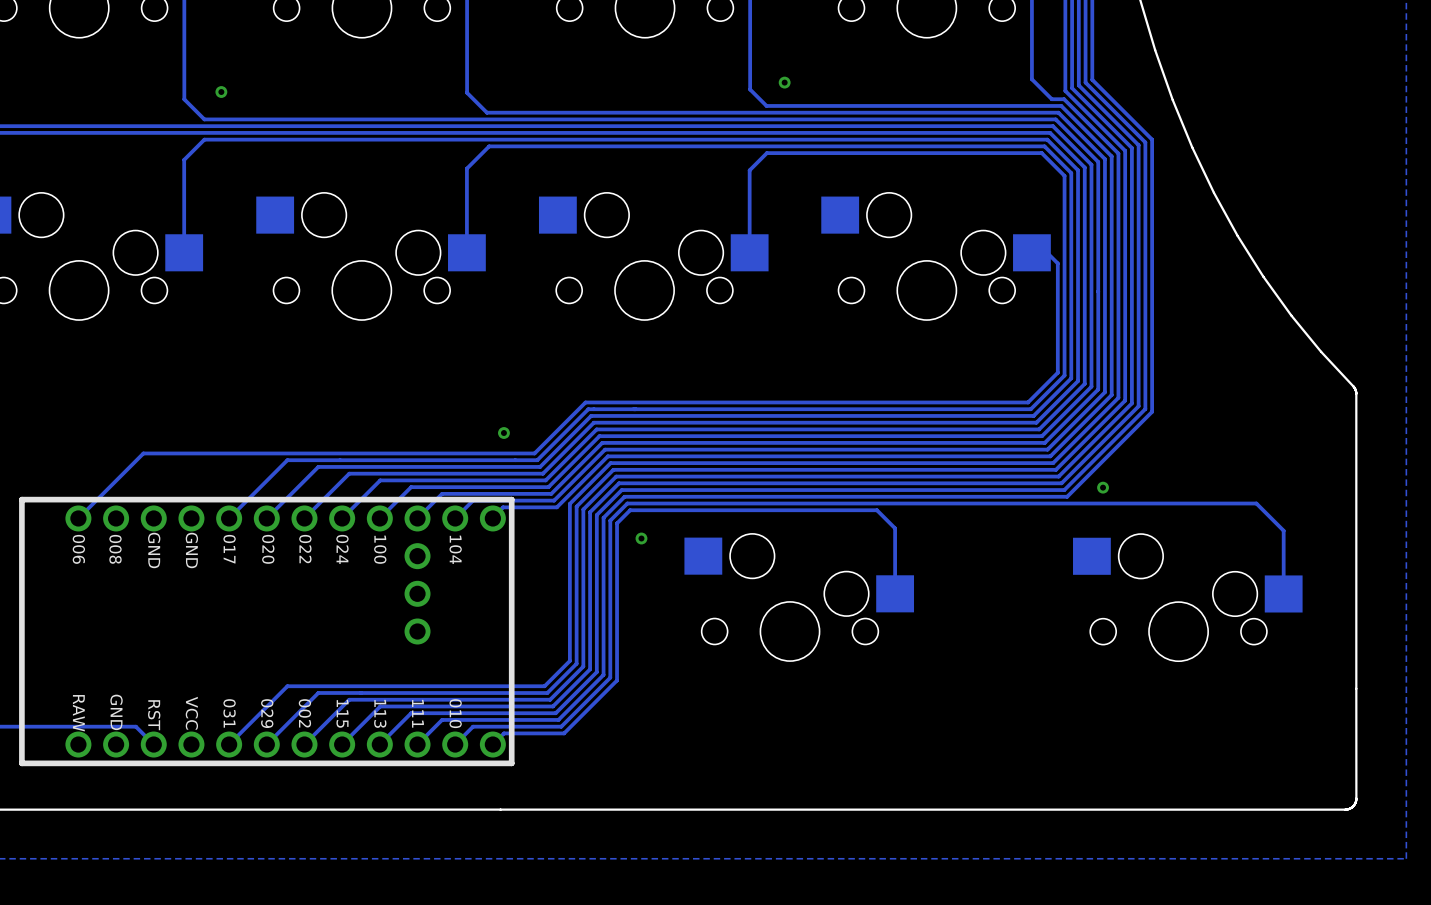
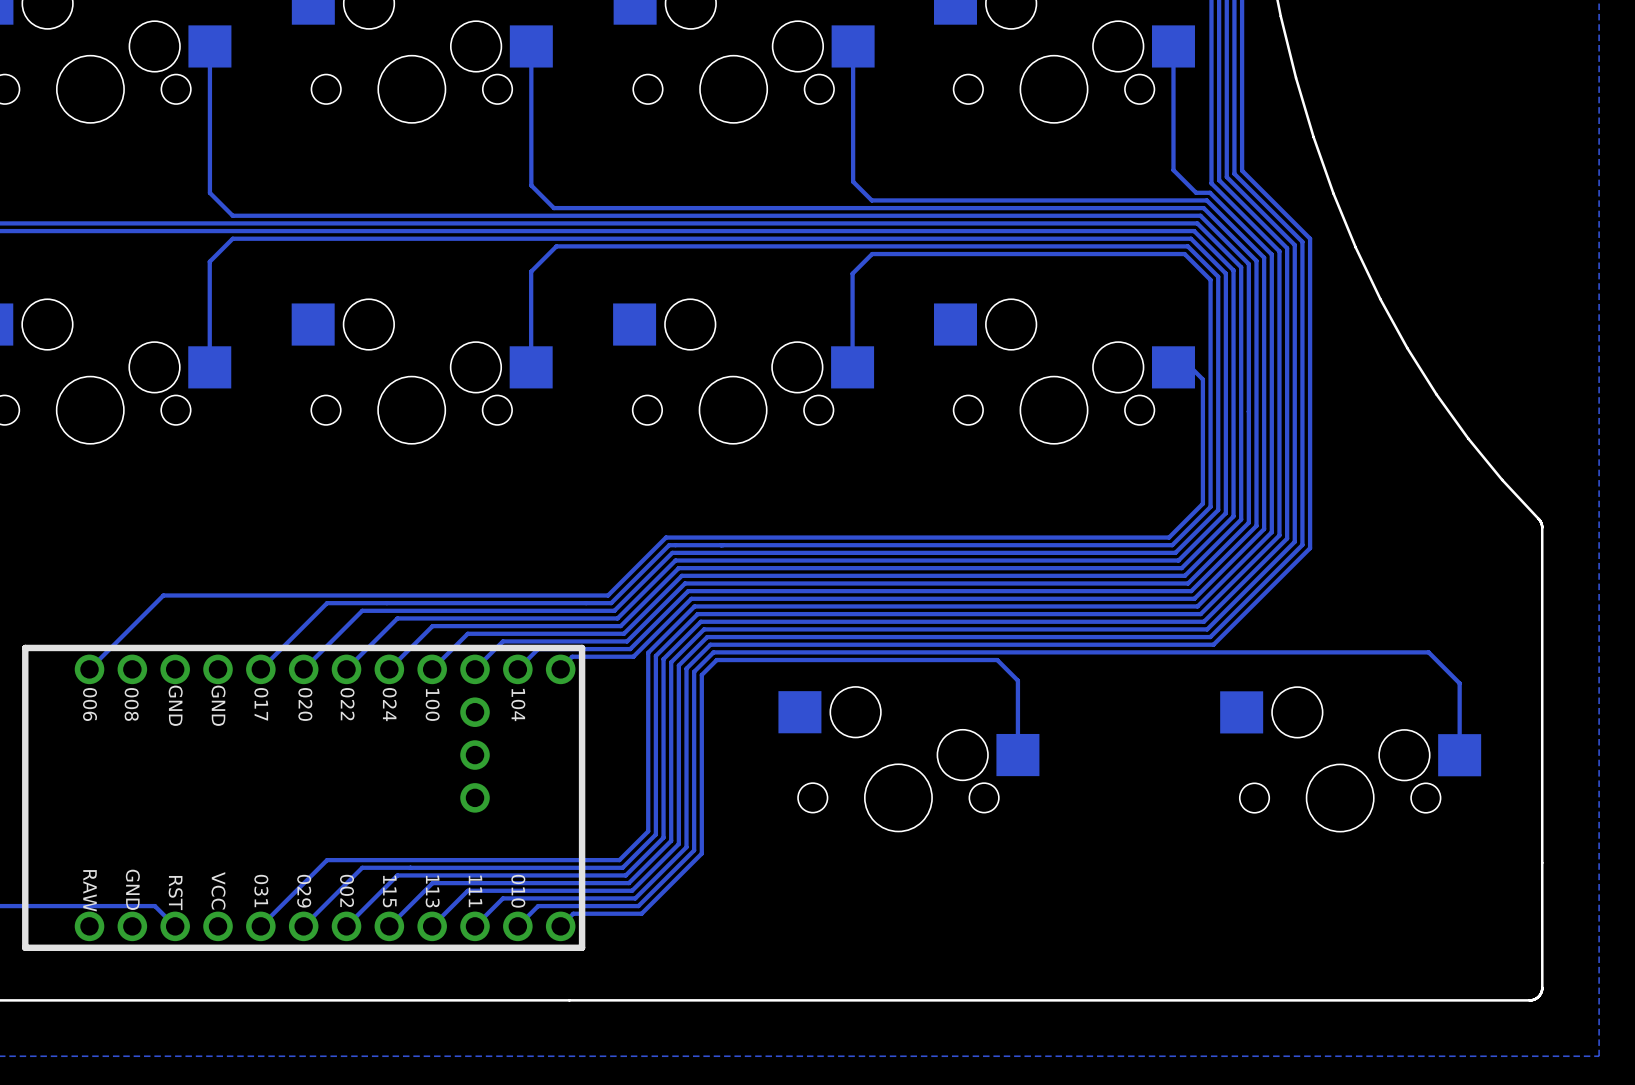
via: (784, 82) -> none
via: (221, 92) -> none
via: (503, 433) -> none
via: (1103, 487) -> none
via: (641, 538) -> none

